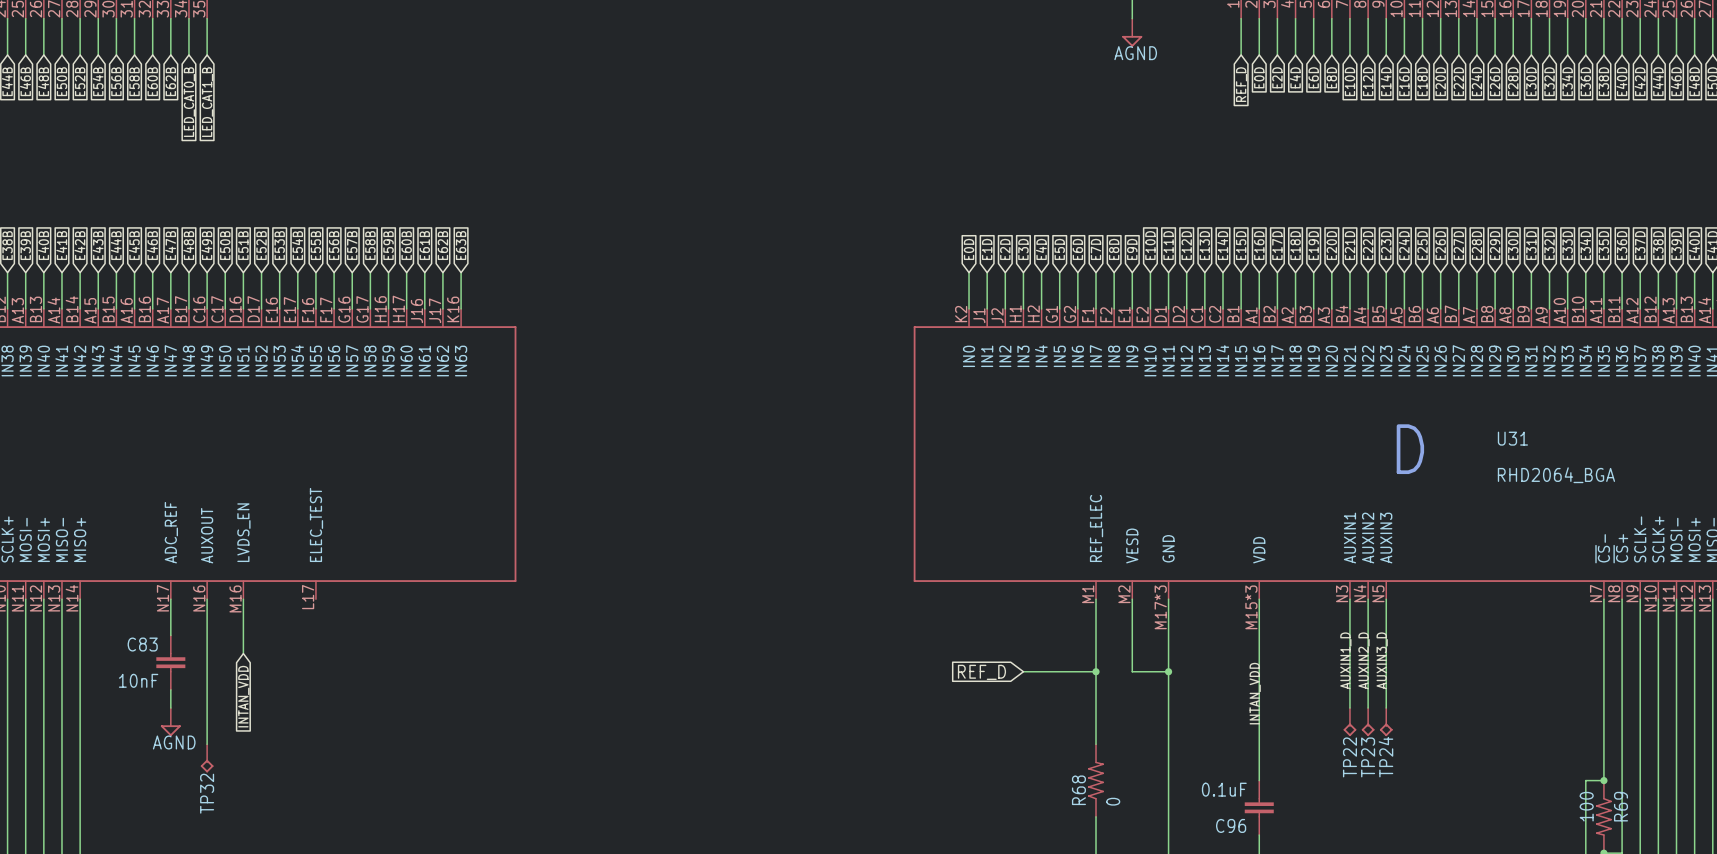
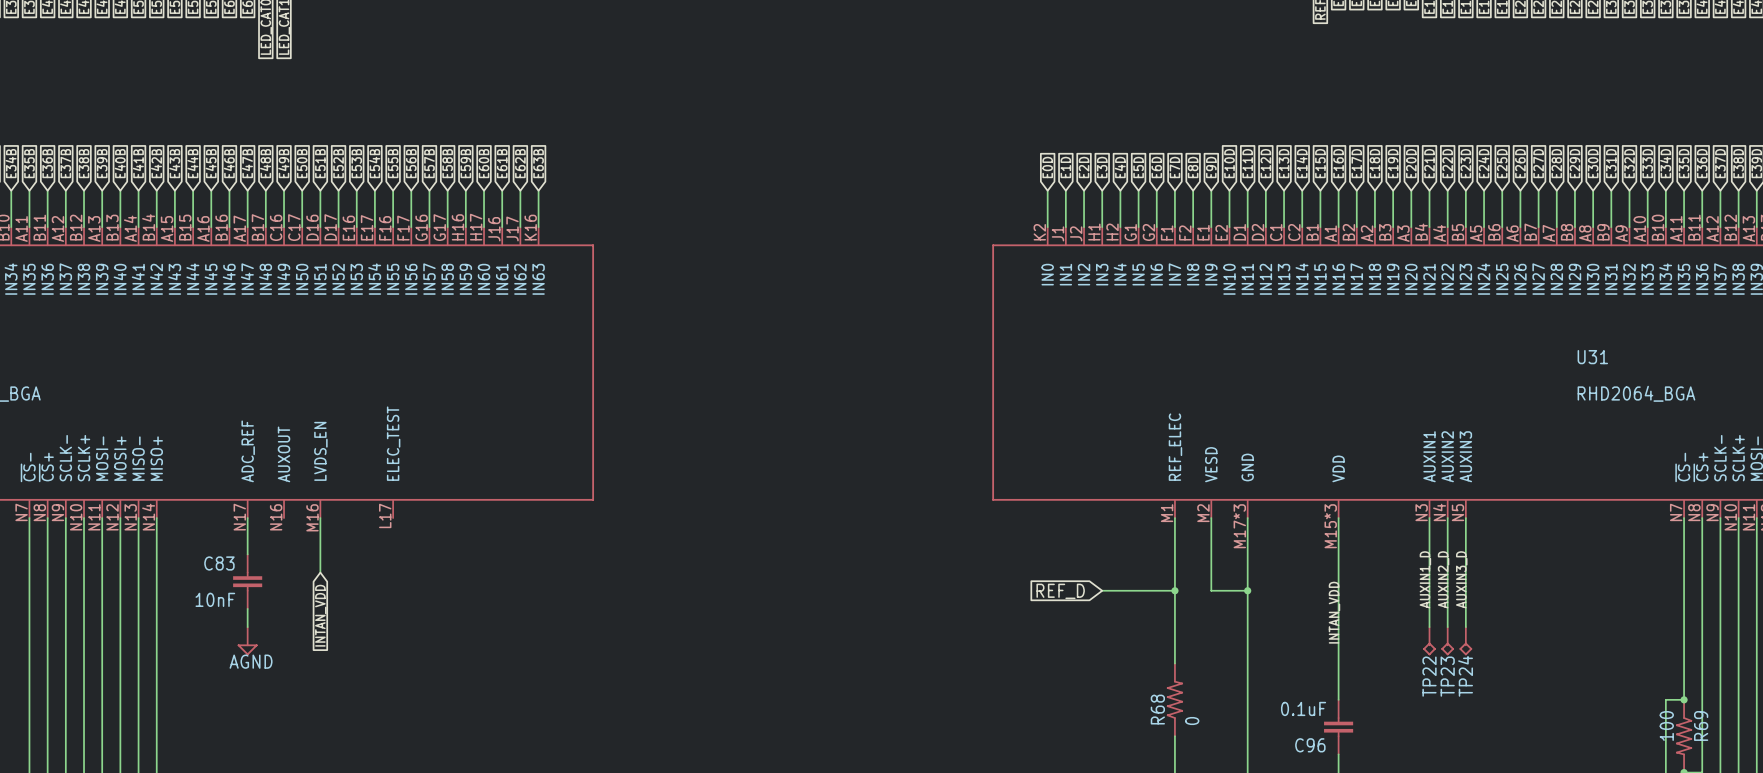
text: D (1410, 449) -> none
wire: (207, 599) (207, 744) -> none
TP32: (207, 758) -> none

